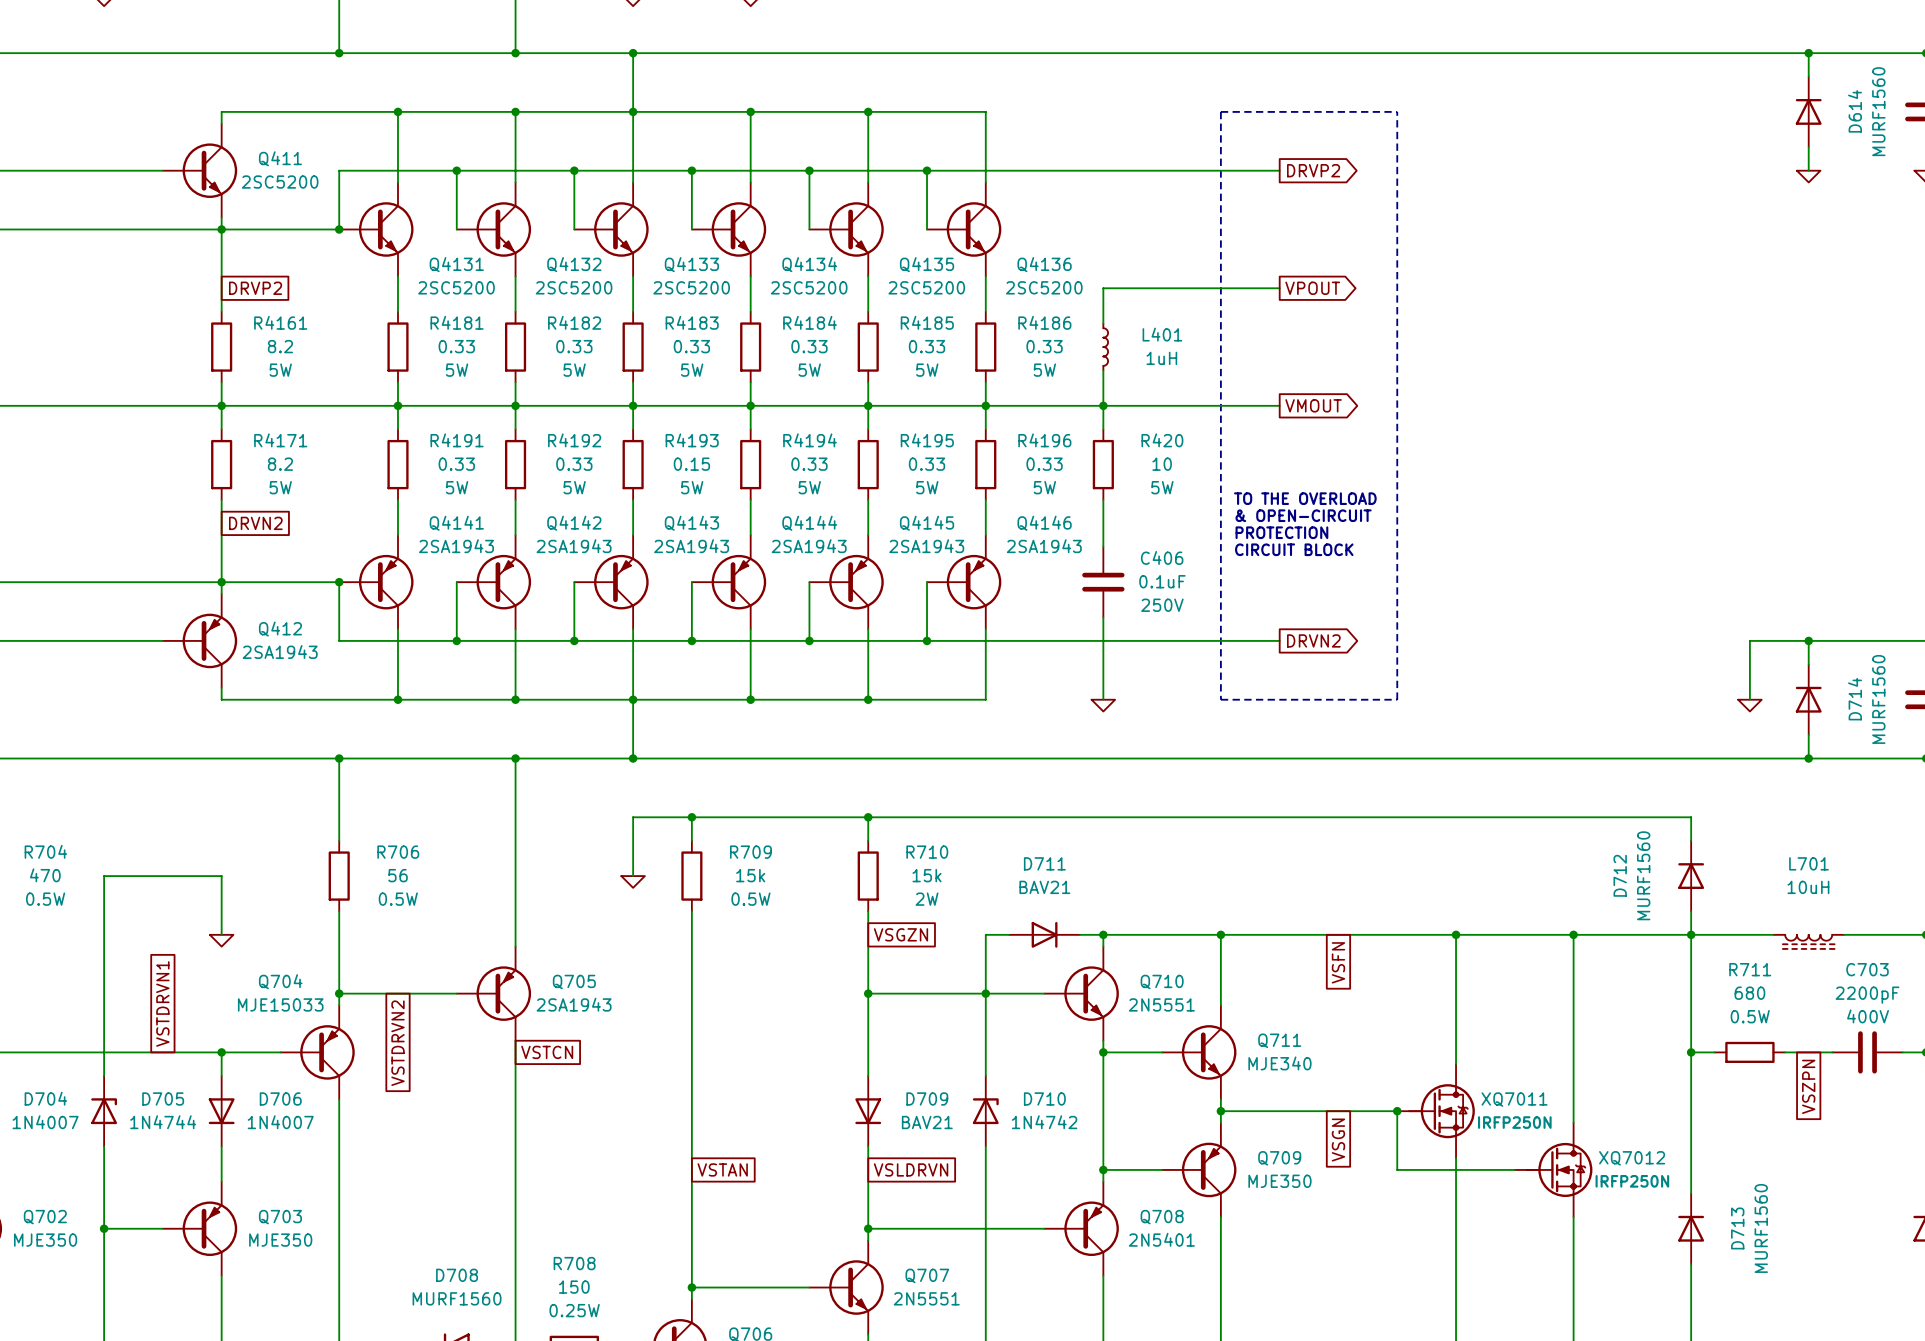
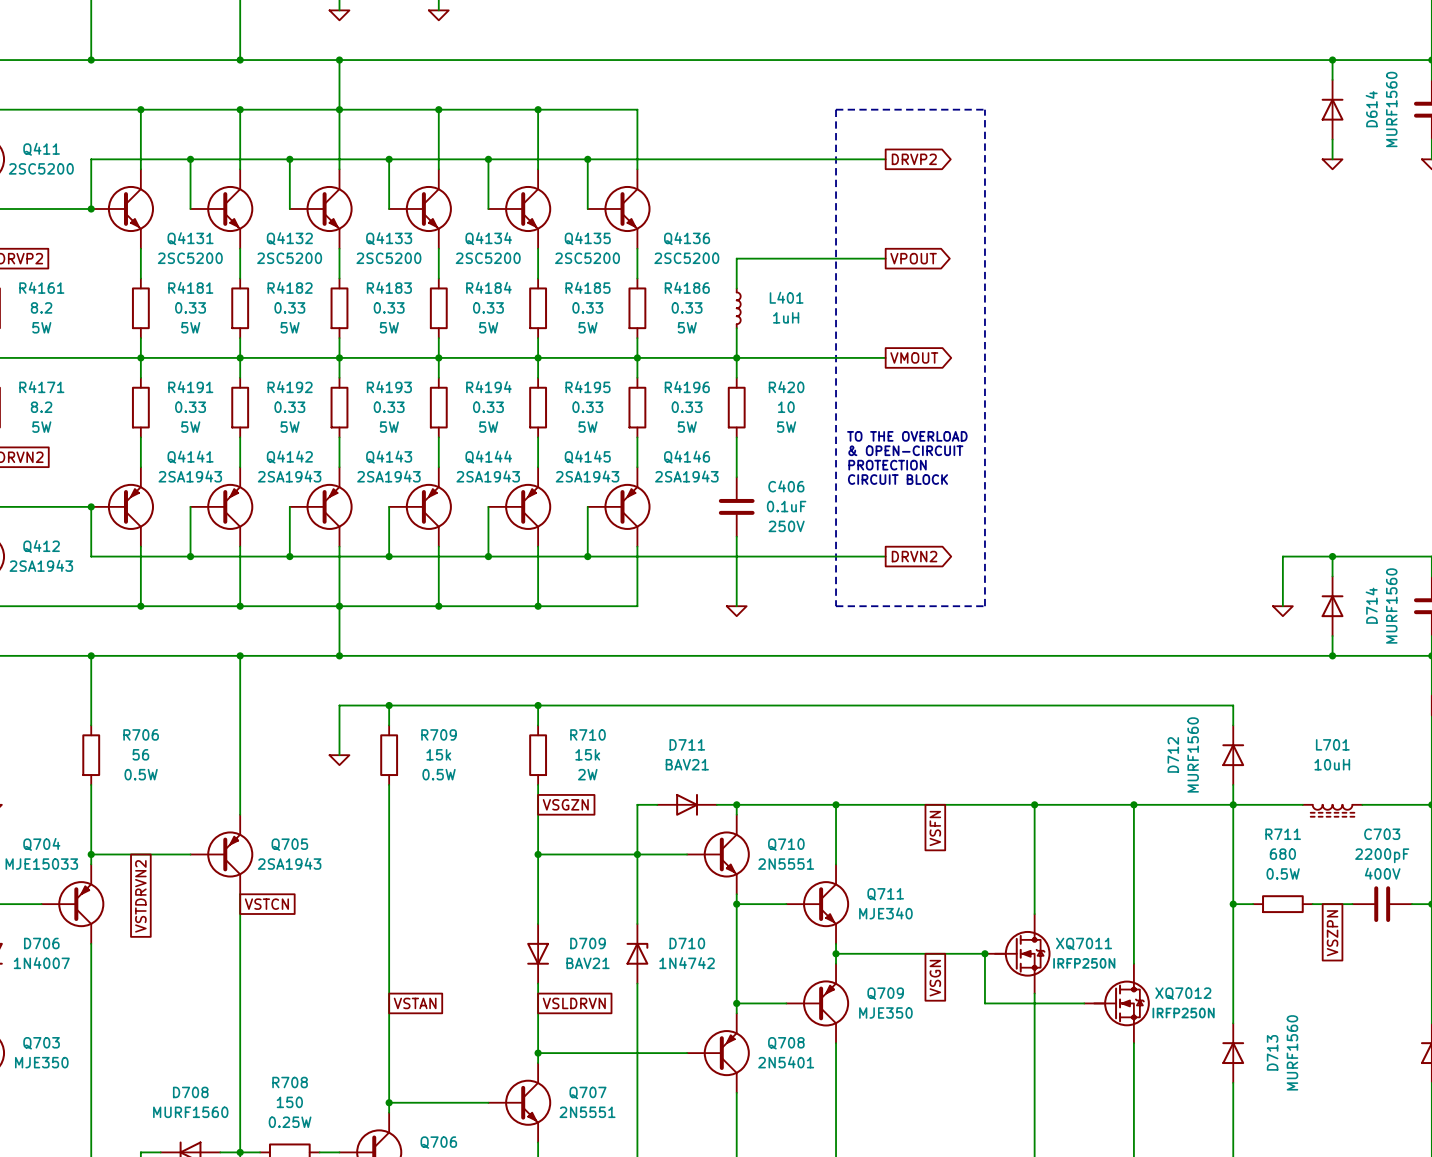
R4193 value: 0.15 (691, 464) -> 0.33 (389, 407)

